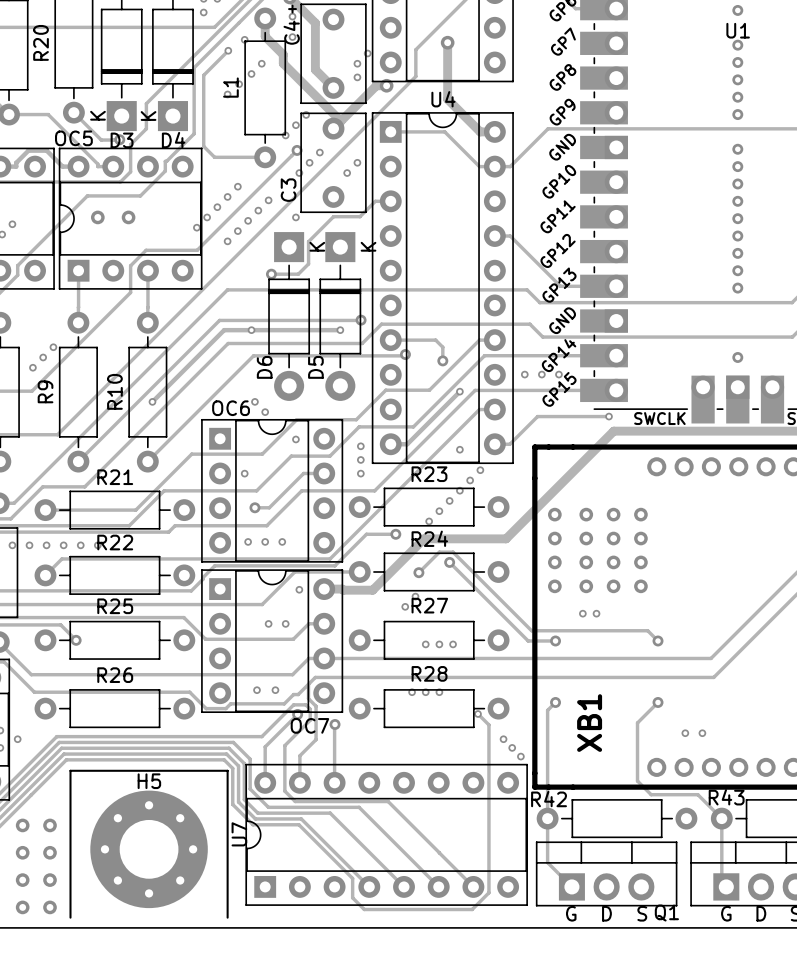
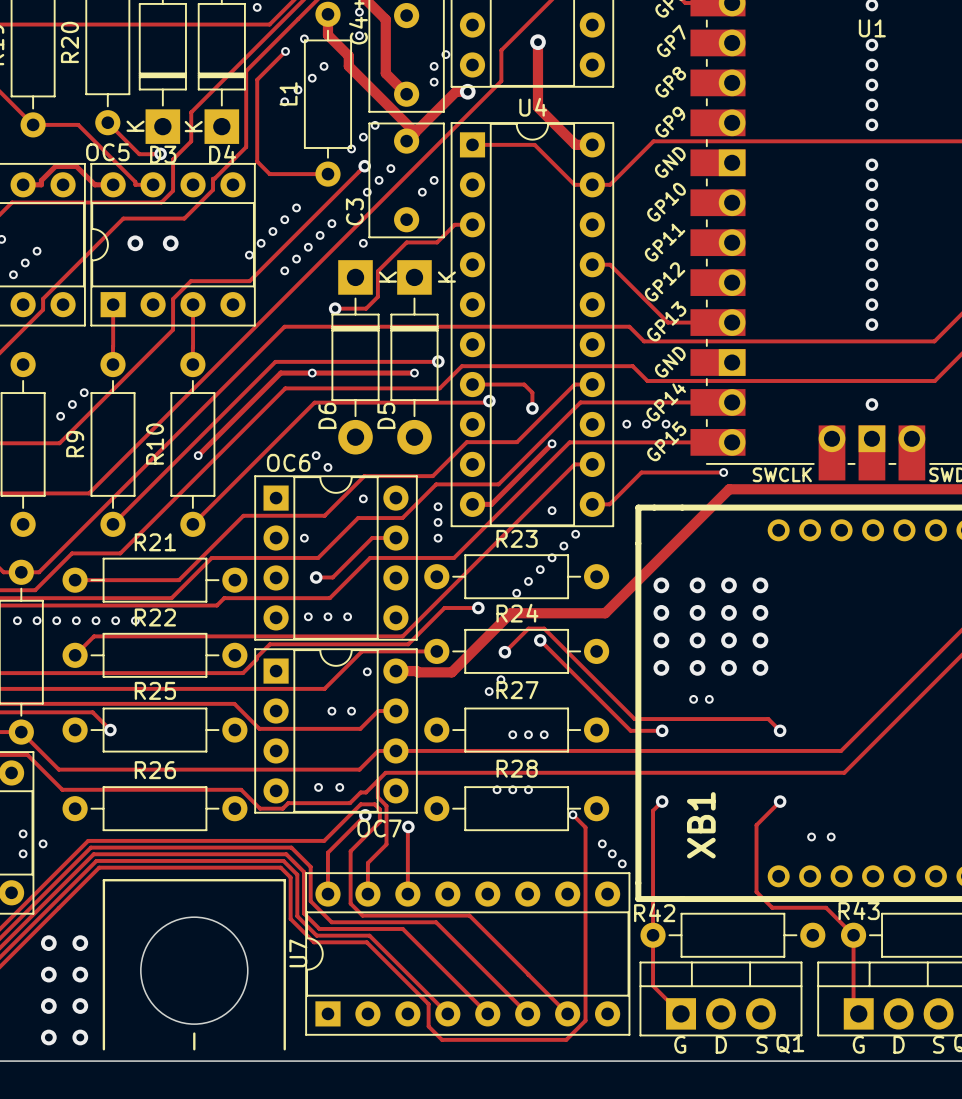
round board edge: none -> [140, 916, 249, 1025]
H5: (149, 849) -> none
line: none -> (194, 1033) (194, 1049)

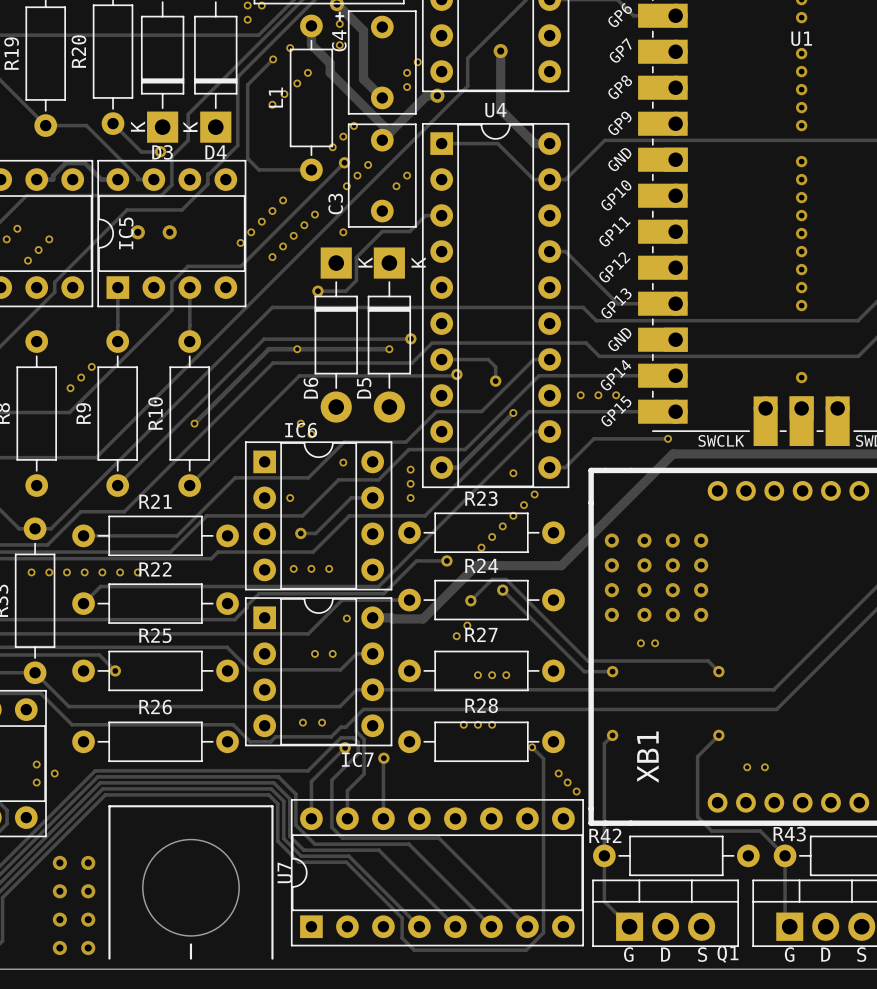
OC5 name: OC5 (107, 152) -> IC5 (126, 233)
OC6 name: OC6 (288, 462) -> IC6 (301, 430)
OC7 name: OC7 (379, 828) -> IC7 (357, 759)

